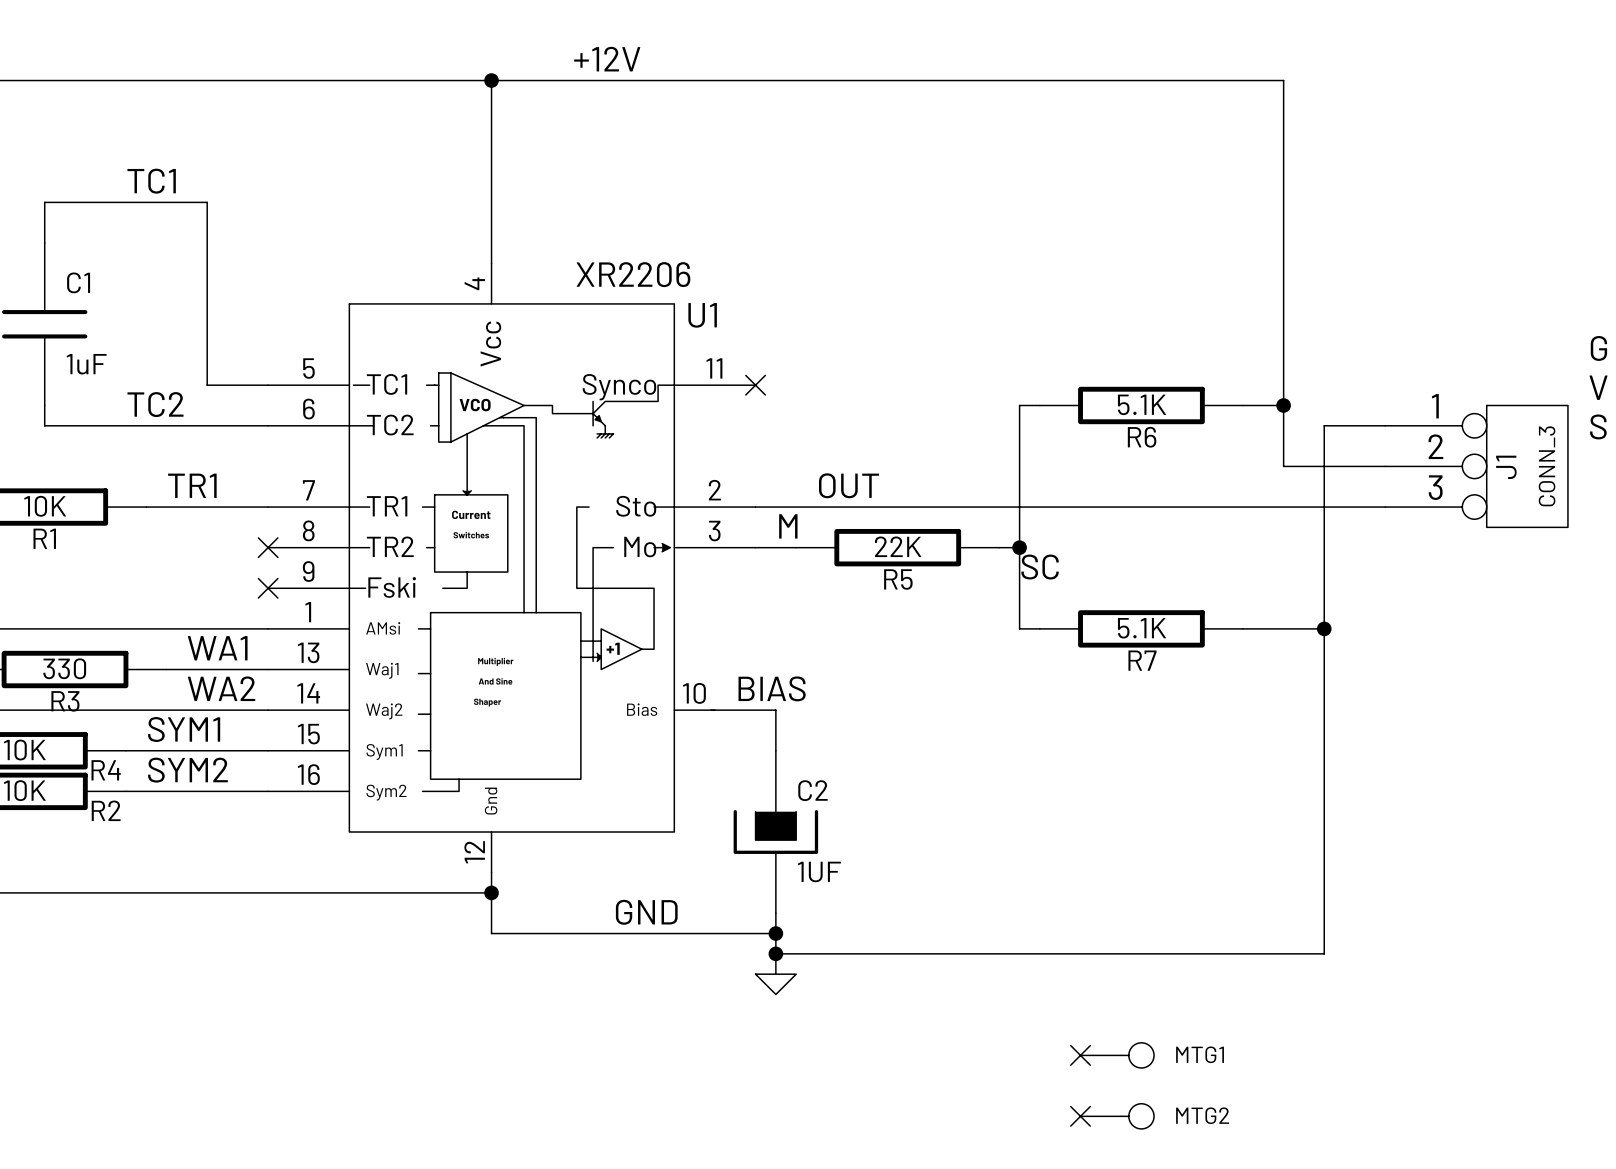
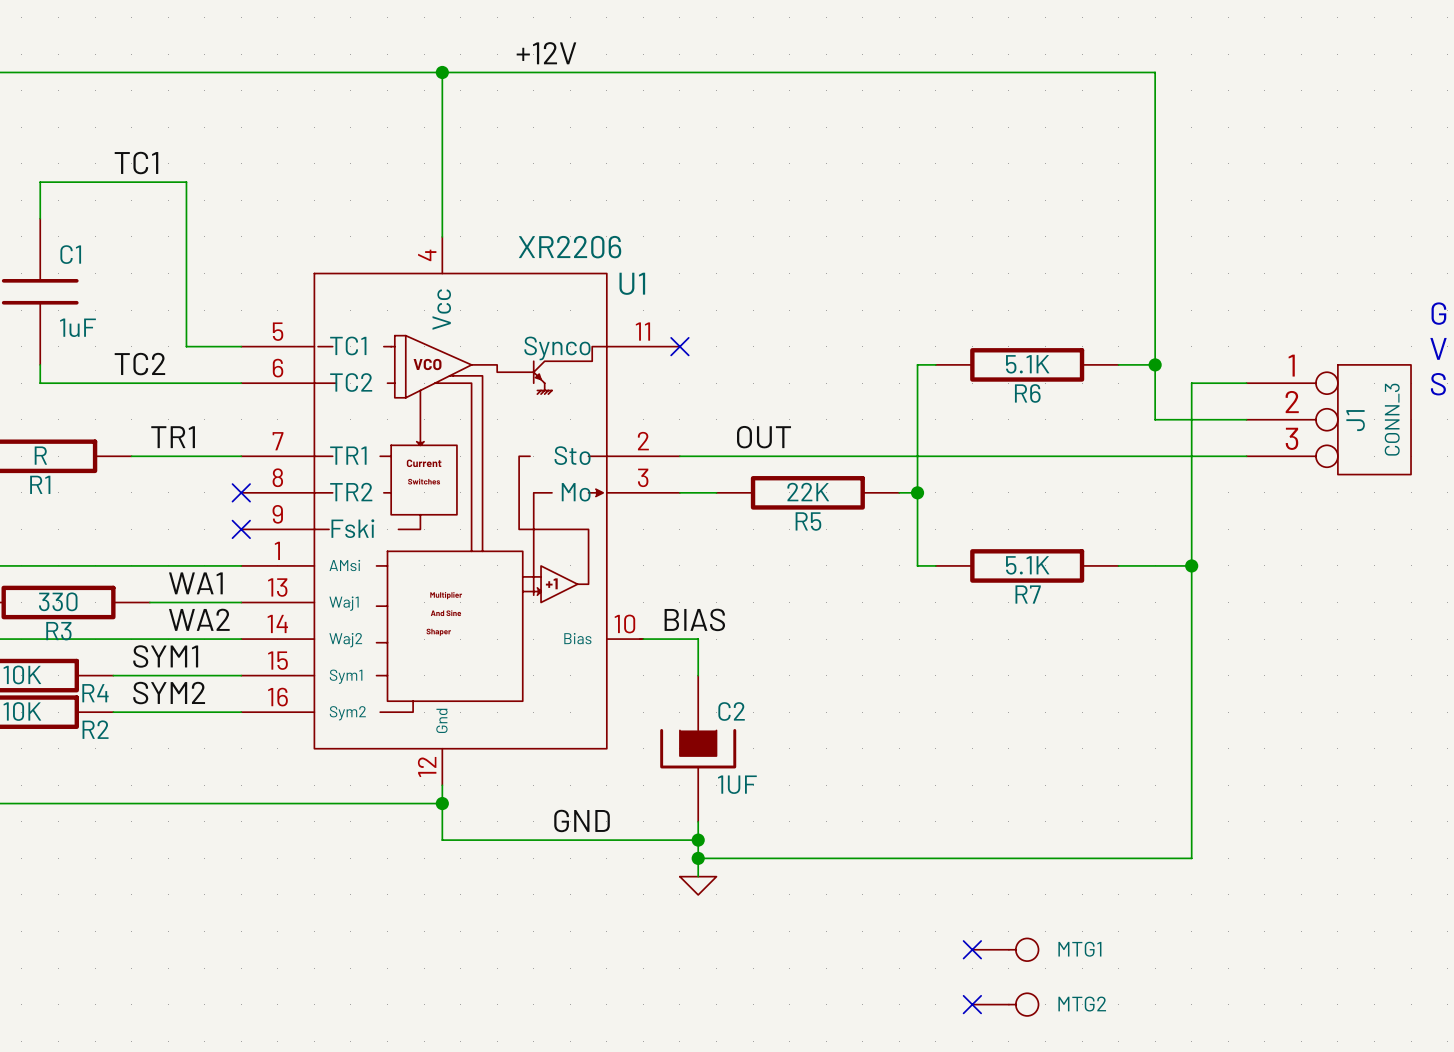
R1 value: 10K (45, 506) -> R (40, 455)
label: M (788, 526) -> none
label: SC (1040, 567) -> none

